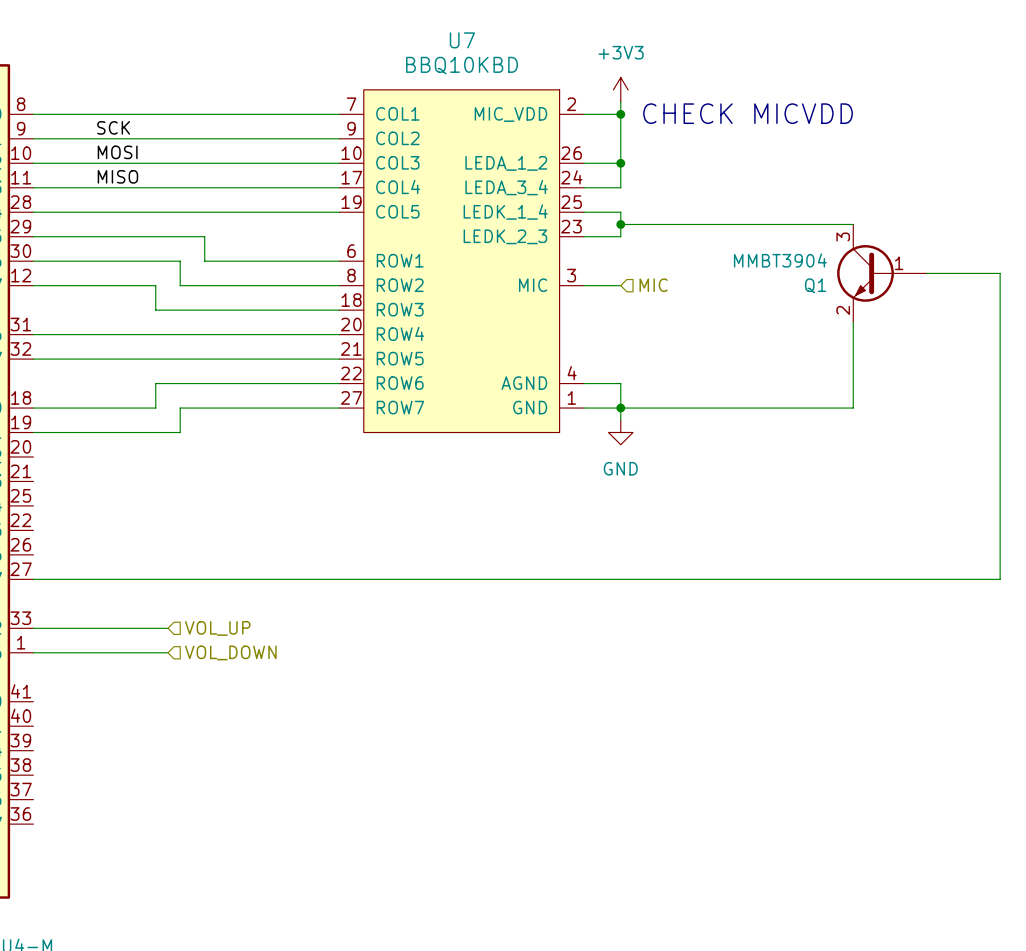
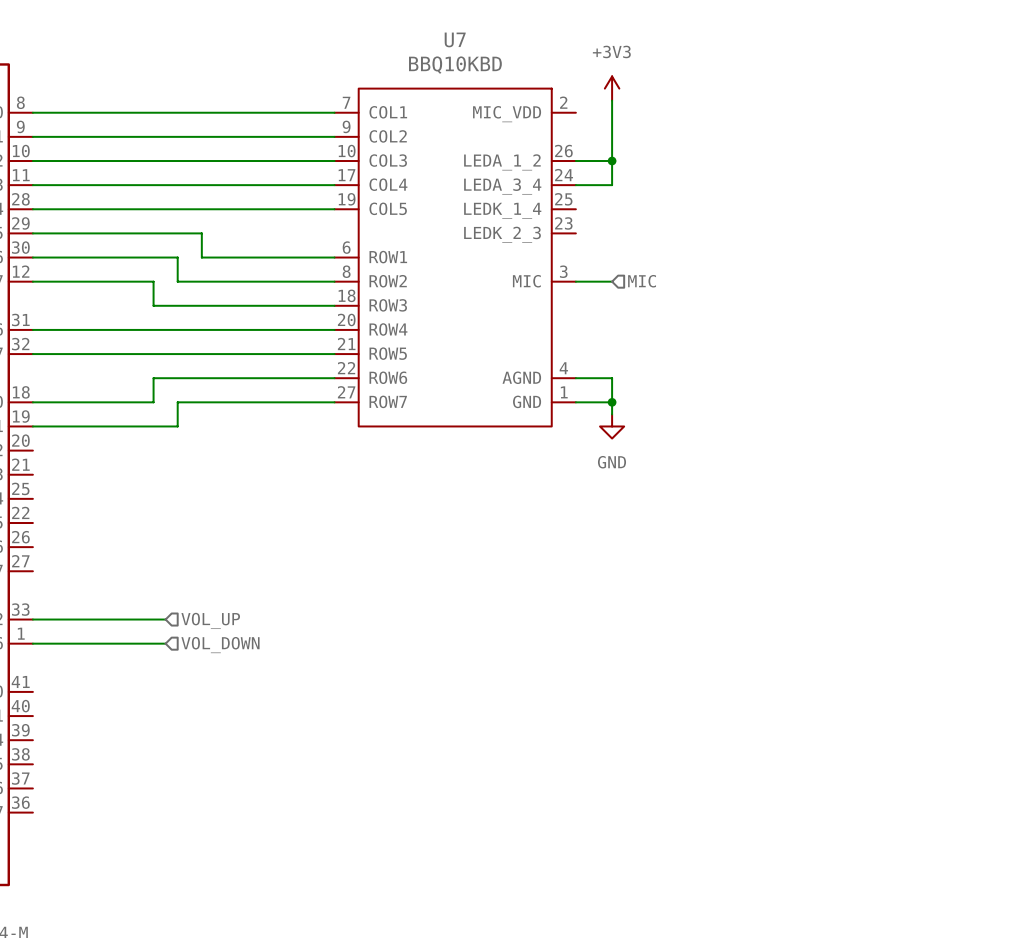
text: CHECK MICVDD (748, 113) -> none
wire: (584, 114) (620, 114) -> none
junction: (620, 114) -> none
label: SCK (113, 127) -> none
label: MOSI (117, 152) -> none
label: MISO (117, 176) -> none
wire: (584, 212) (620, 212) (620, 236) (584, 236) -> none
wire: (620, 224) (853, 224) -> none
junction: (620, 224) -> none
Q1: MMBT3904 (881, 273) -> none
wire: (926, 273) (1000, 273) (1000, 579) (33, 579) -> none
wire: (853, 322) (853, 408) (620, 408) -> none

